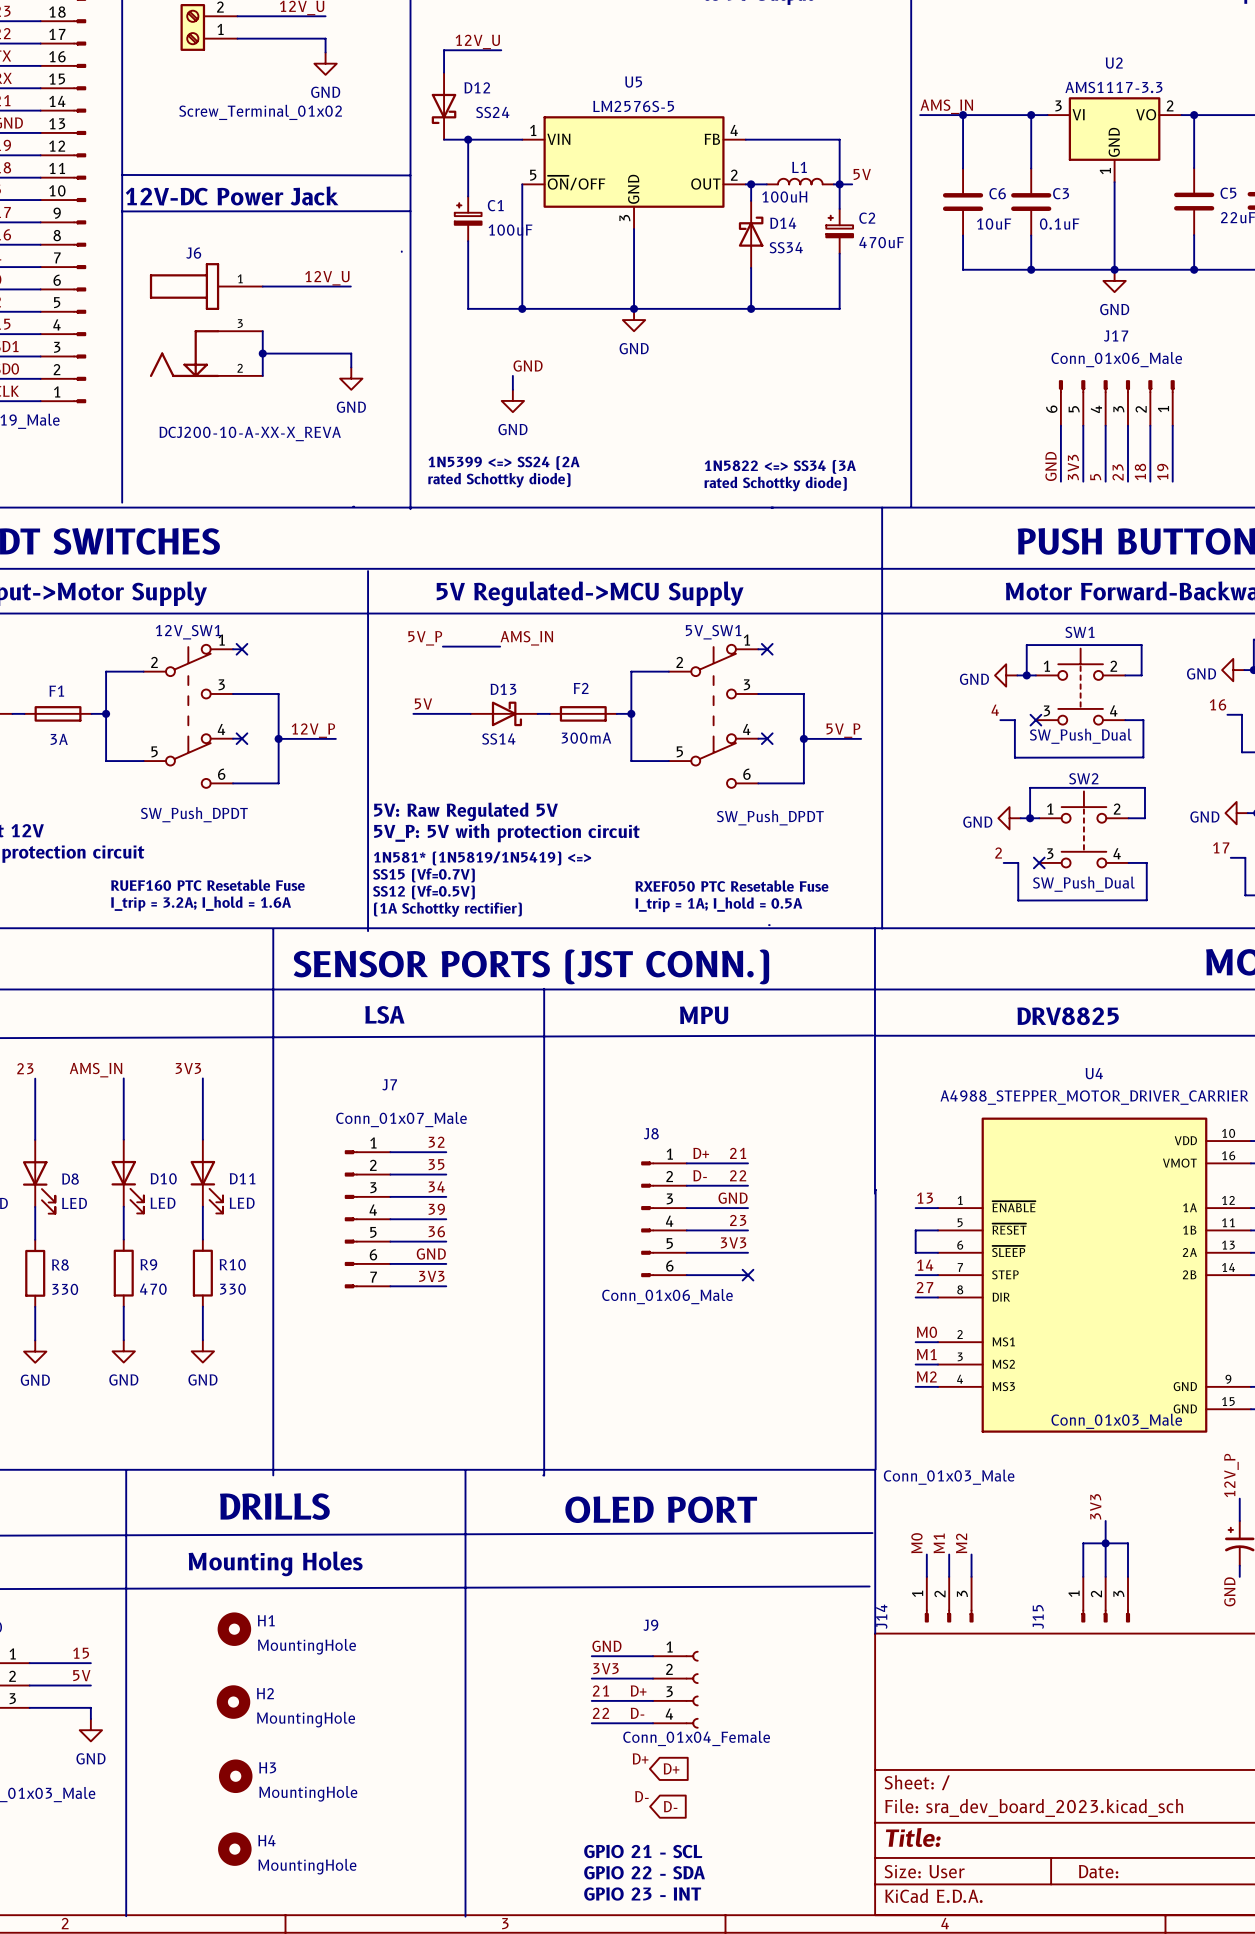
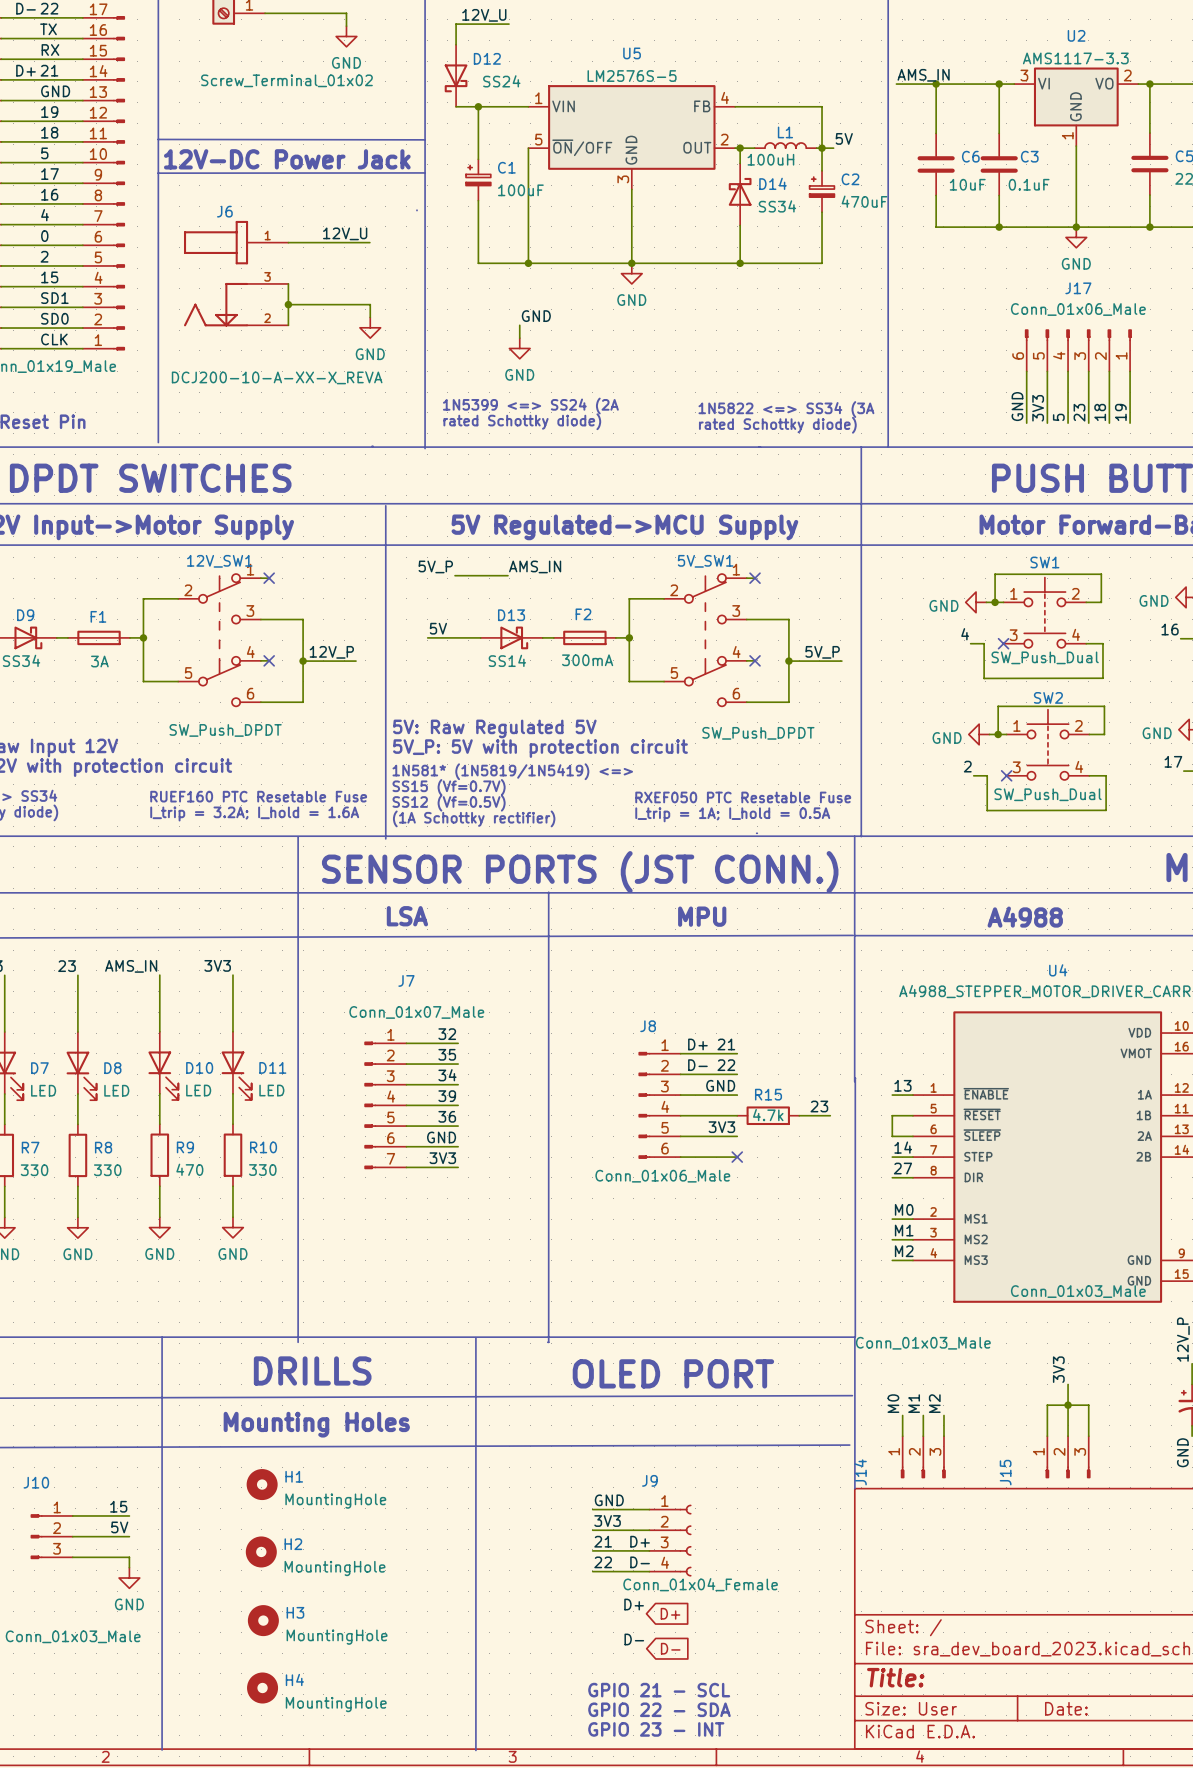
text: DRV8825 (1068, 1016) -> A4988 (1025, 917)
label position: 23 (738, 1220) -> 23 (819, 1106)
R15: none -> 4.7k (768, 1115)
wire: none -> (799, 1115) (830, 1115)

